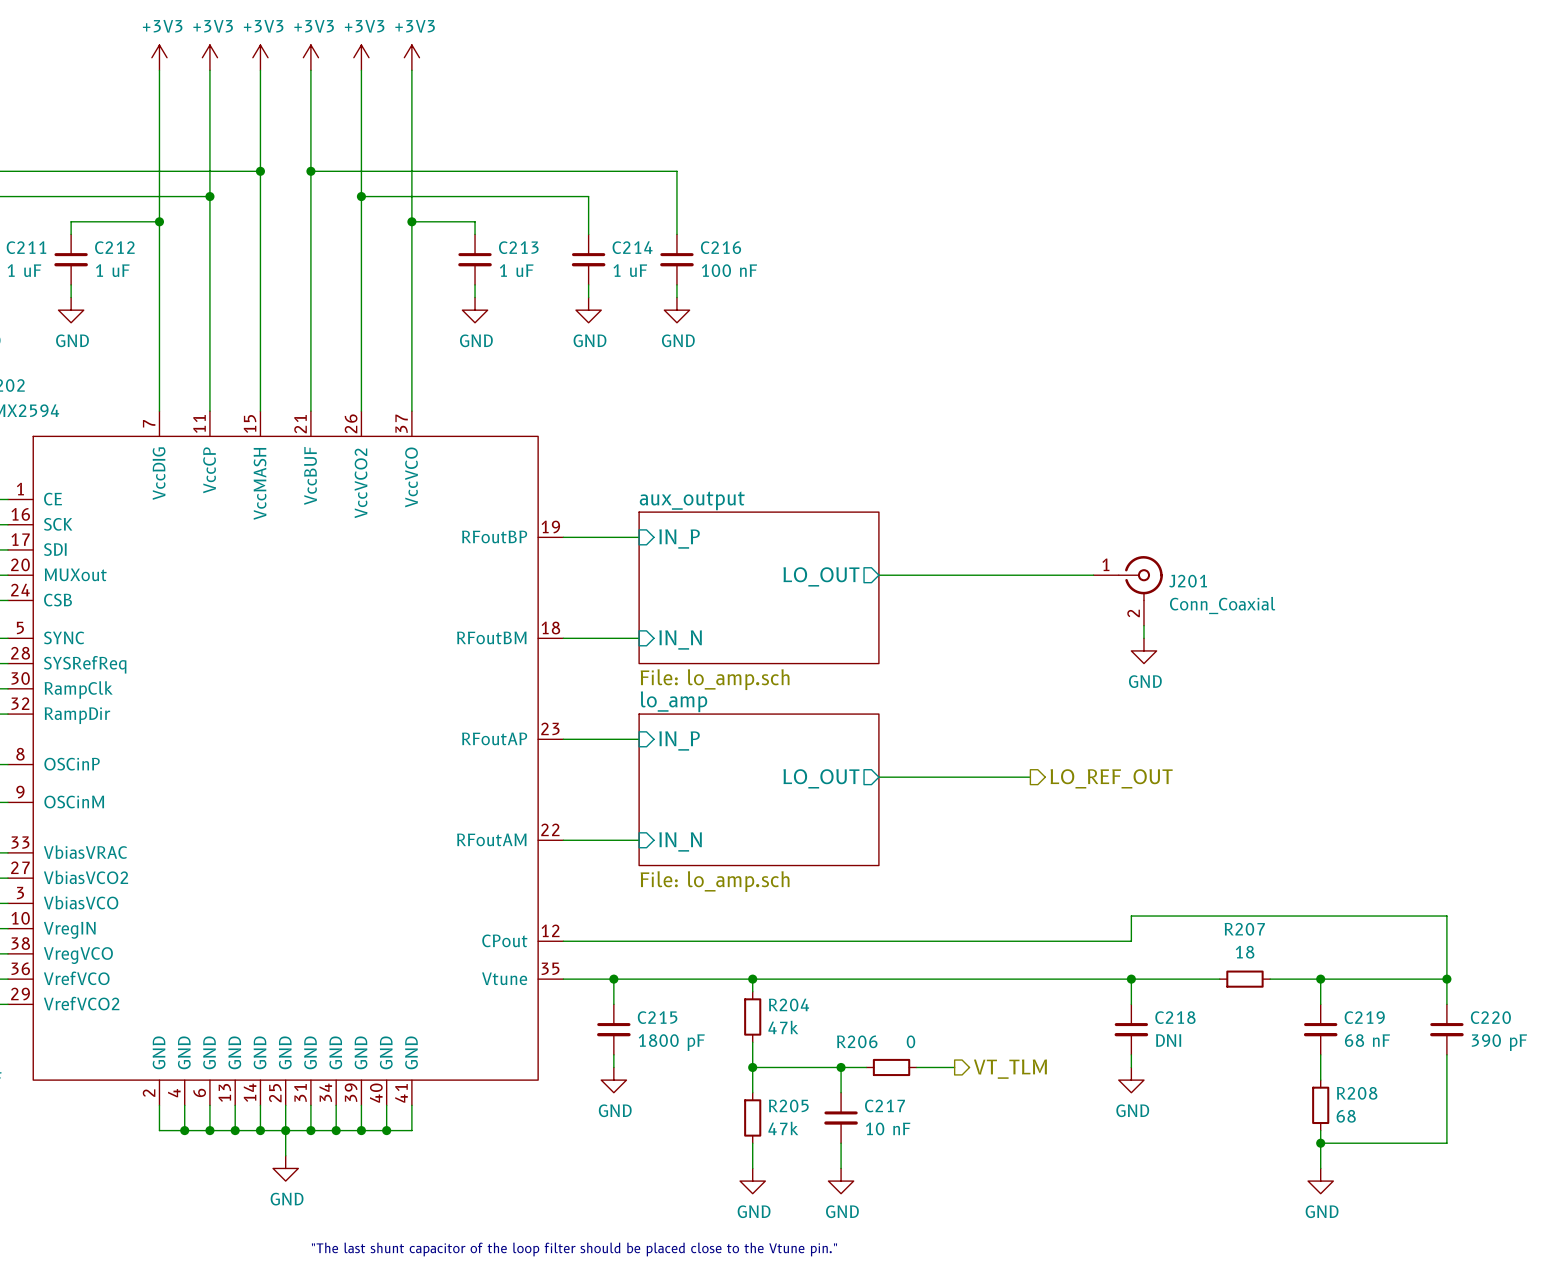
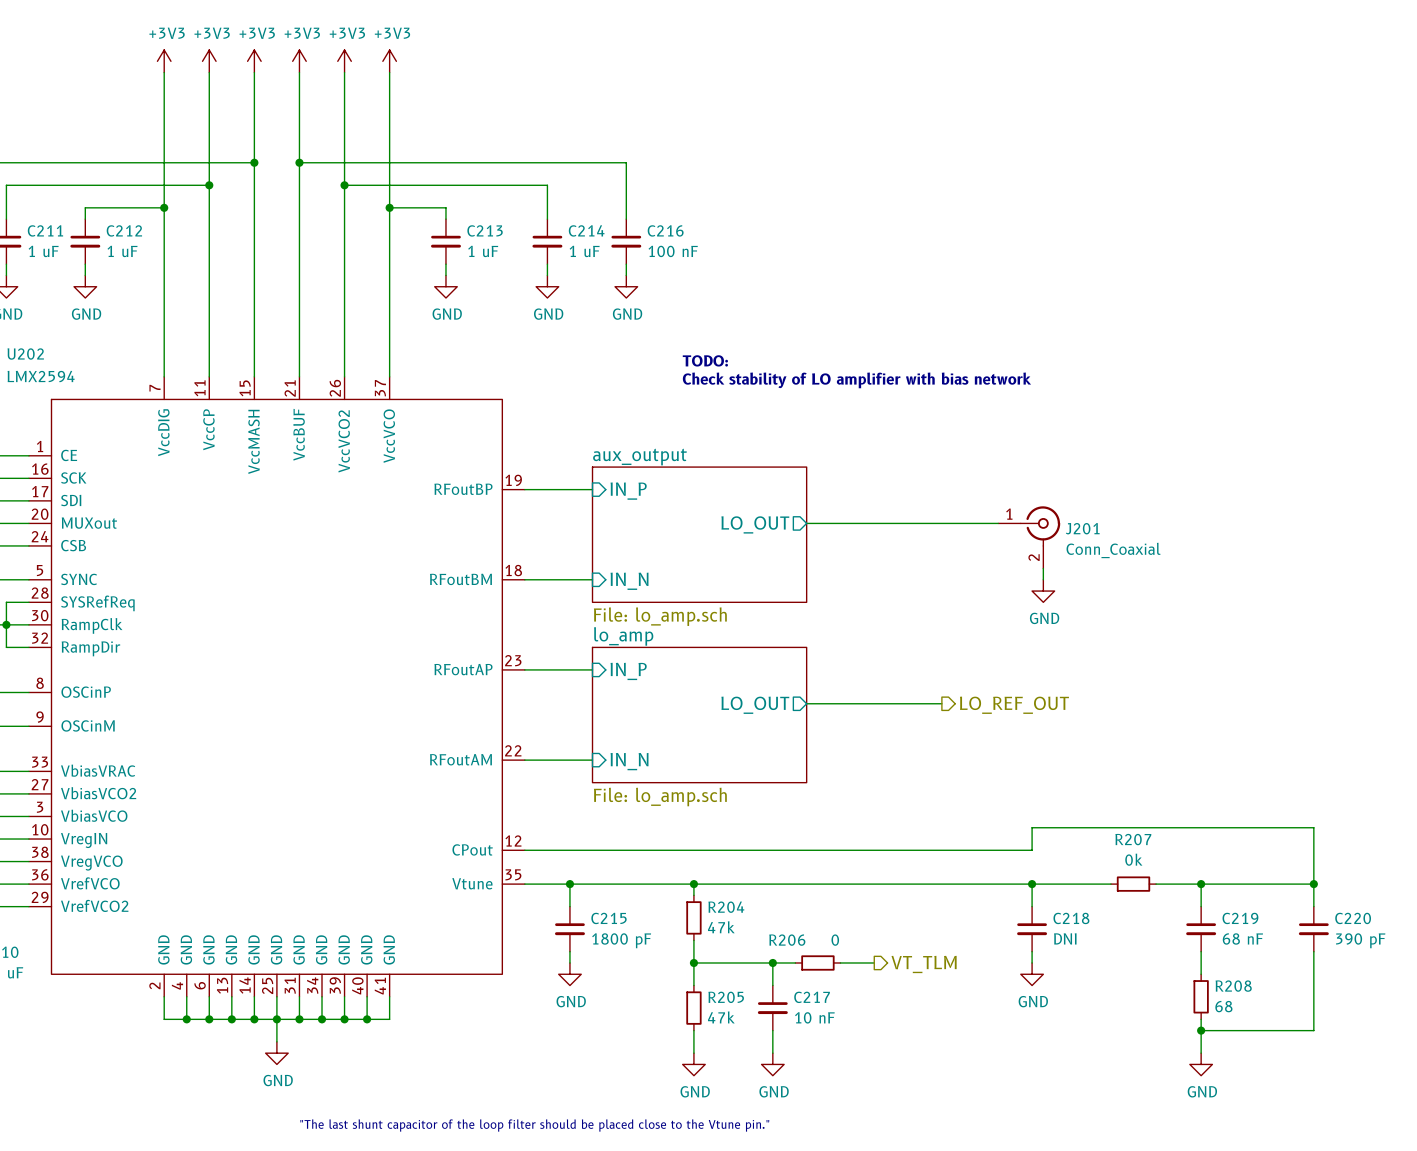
text: none -> TODO: (705, 360)
text: none -> Check stability of LO amplifier with bias network (856, 380)
R207 value: 18 (1245, 952) -> 0k (1133, 859)

